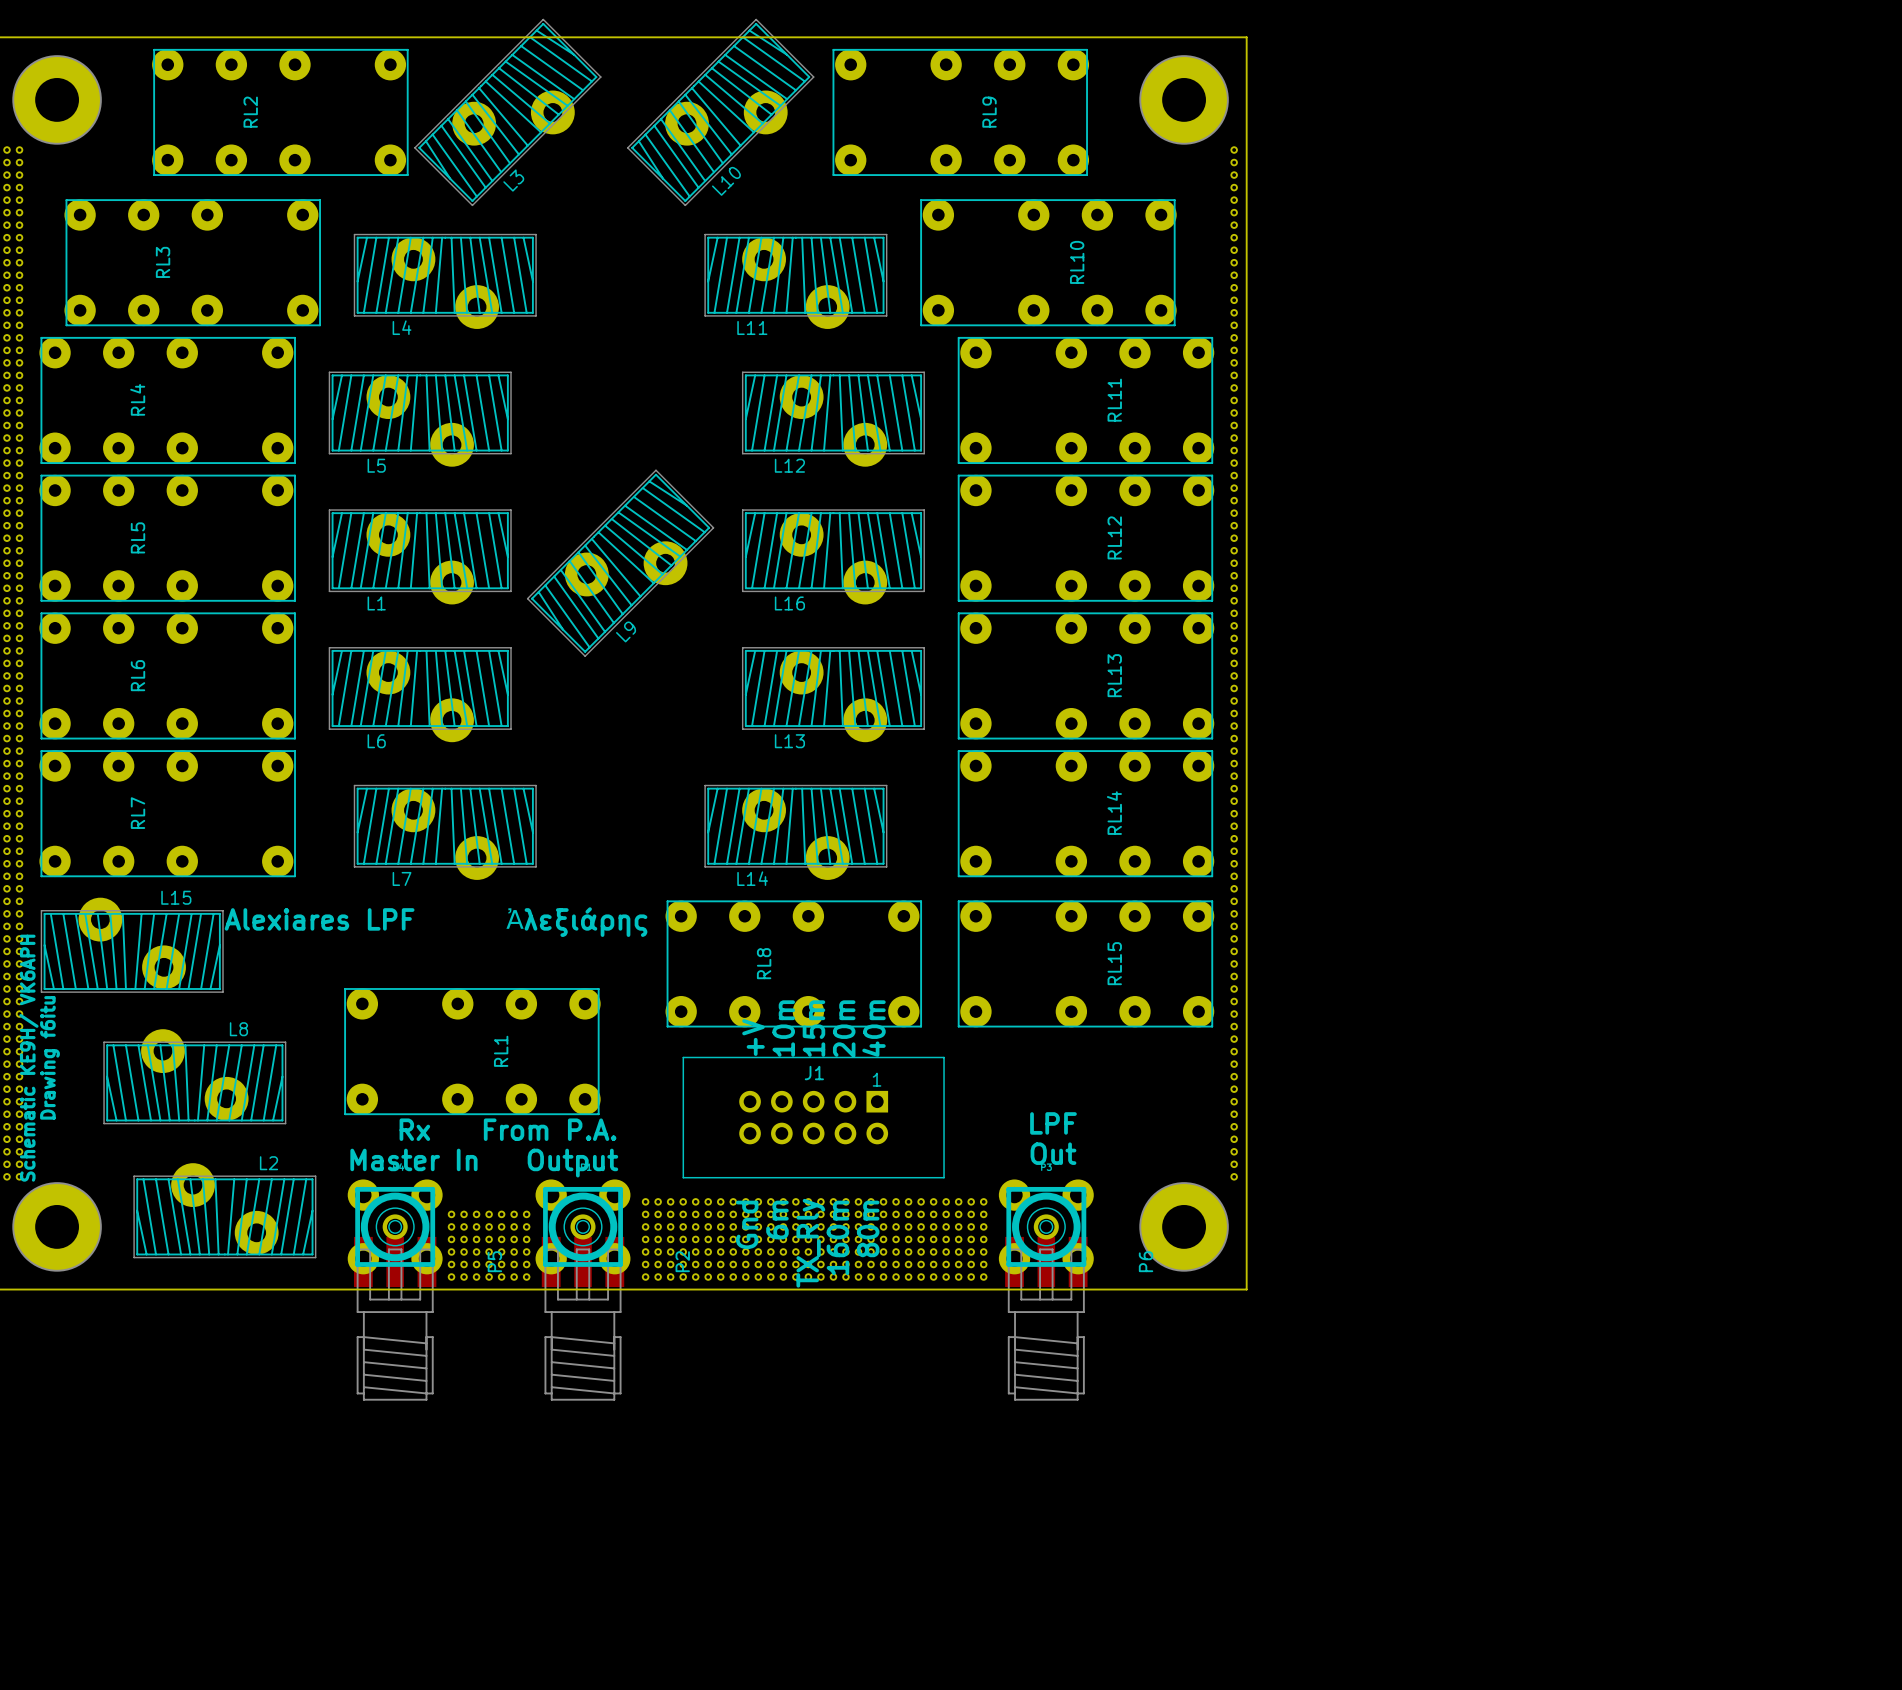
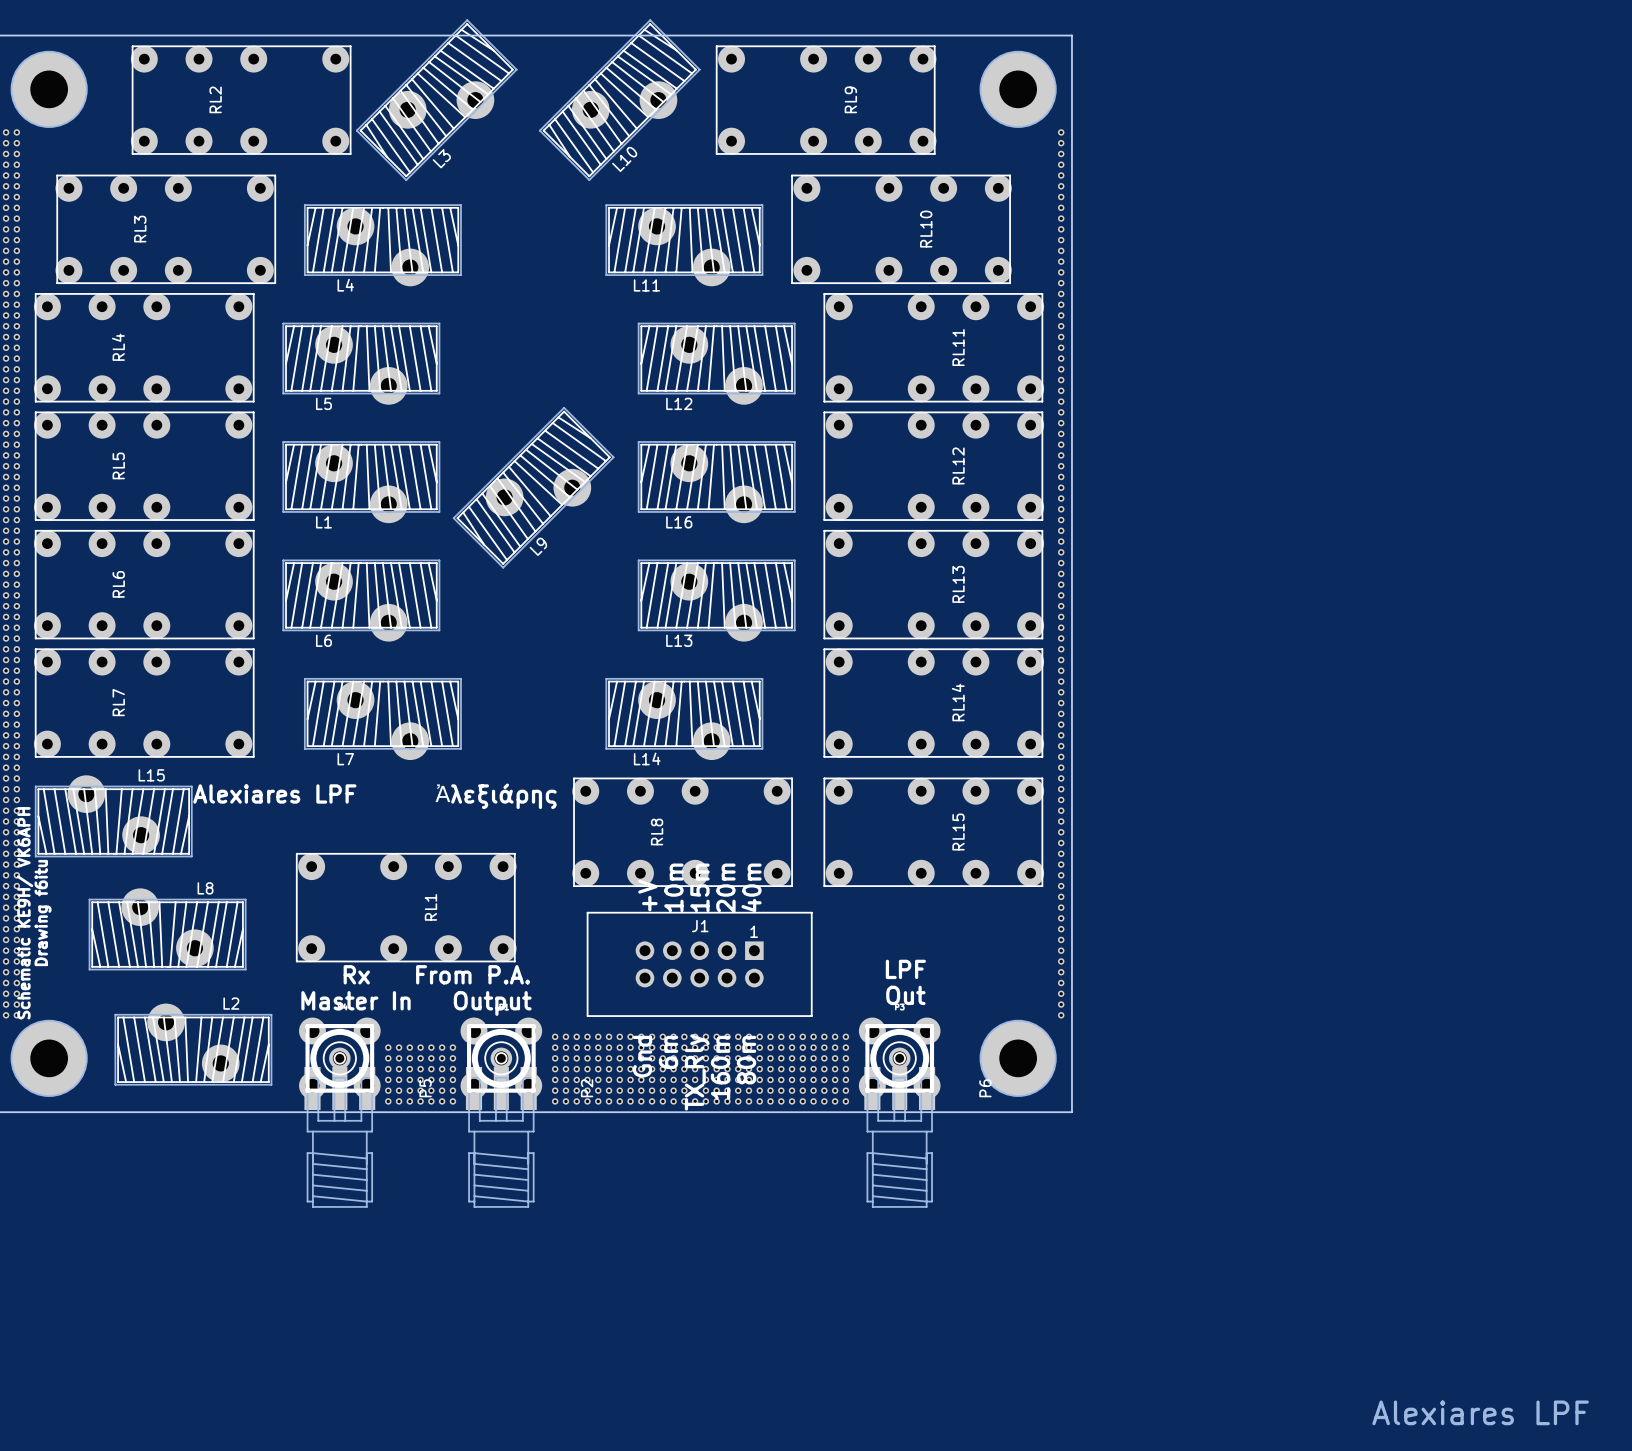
text: none -> Alexiares LPF (1480, 1412)

